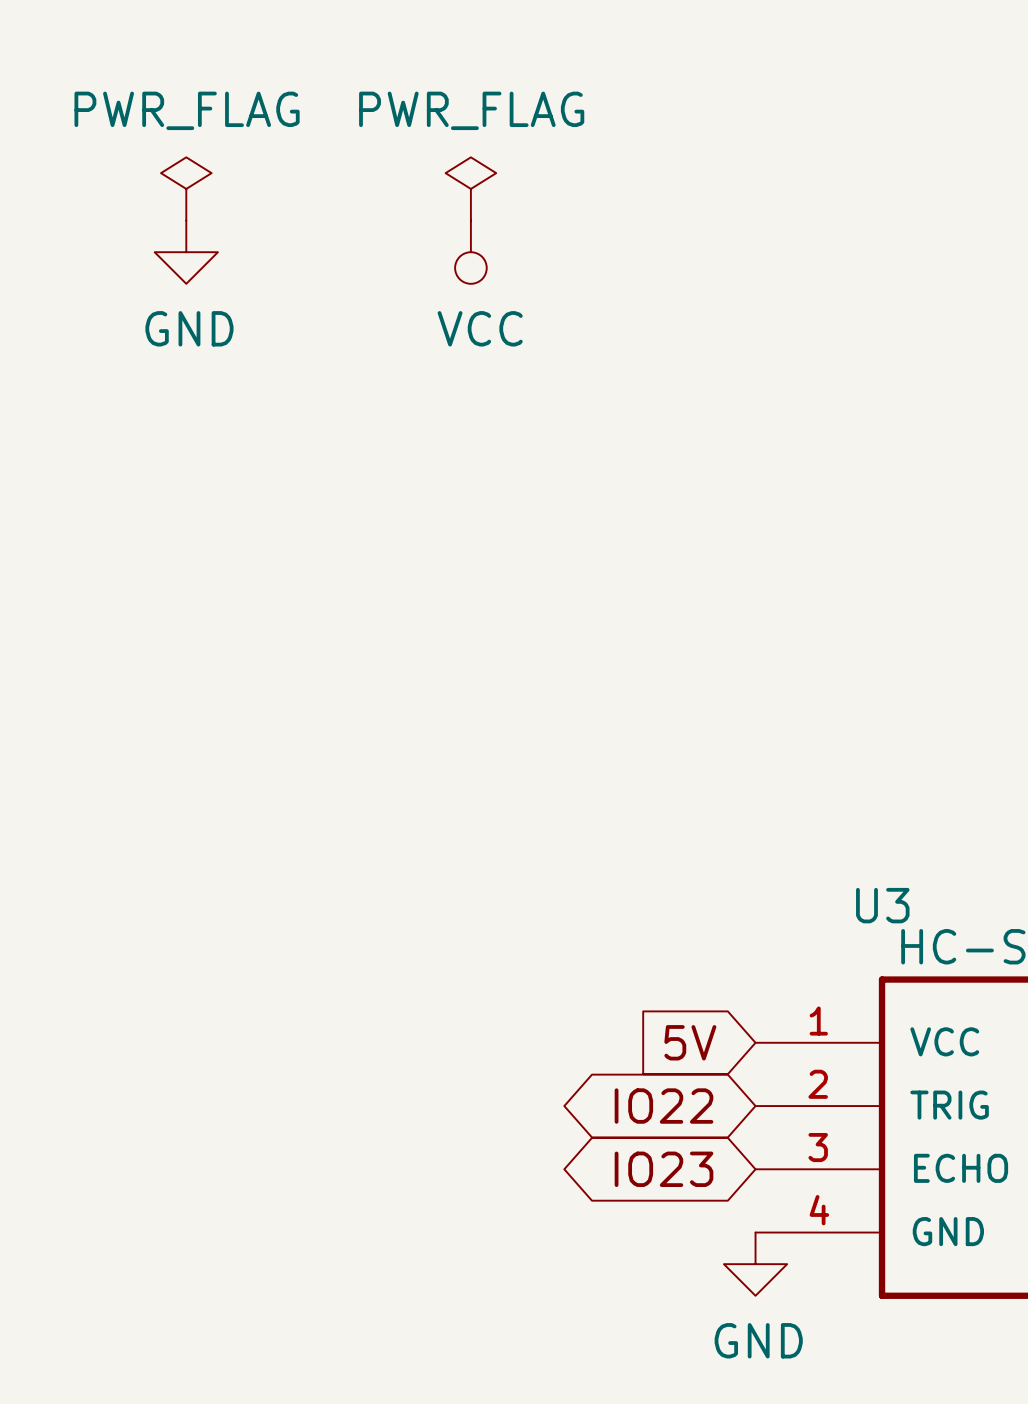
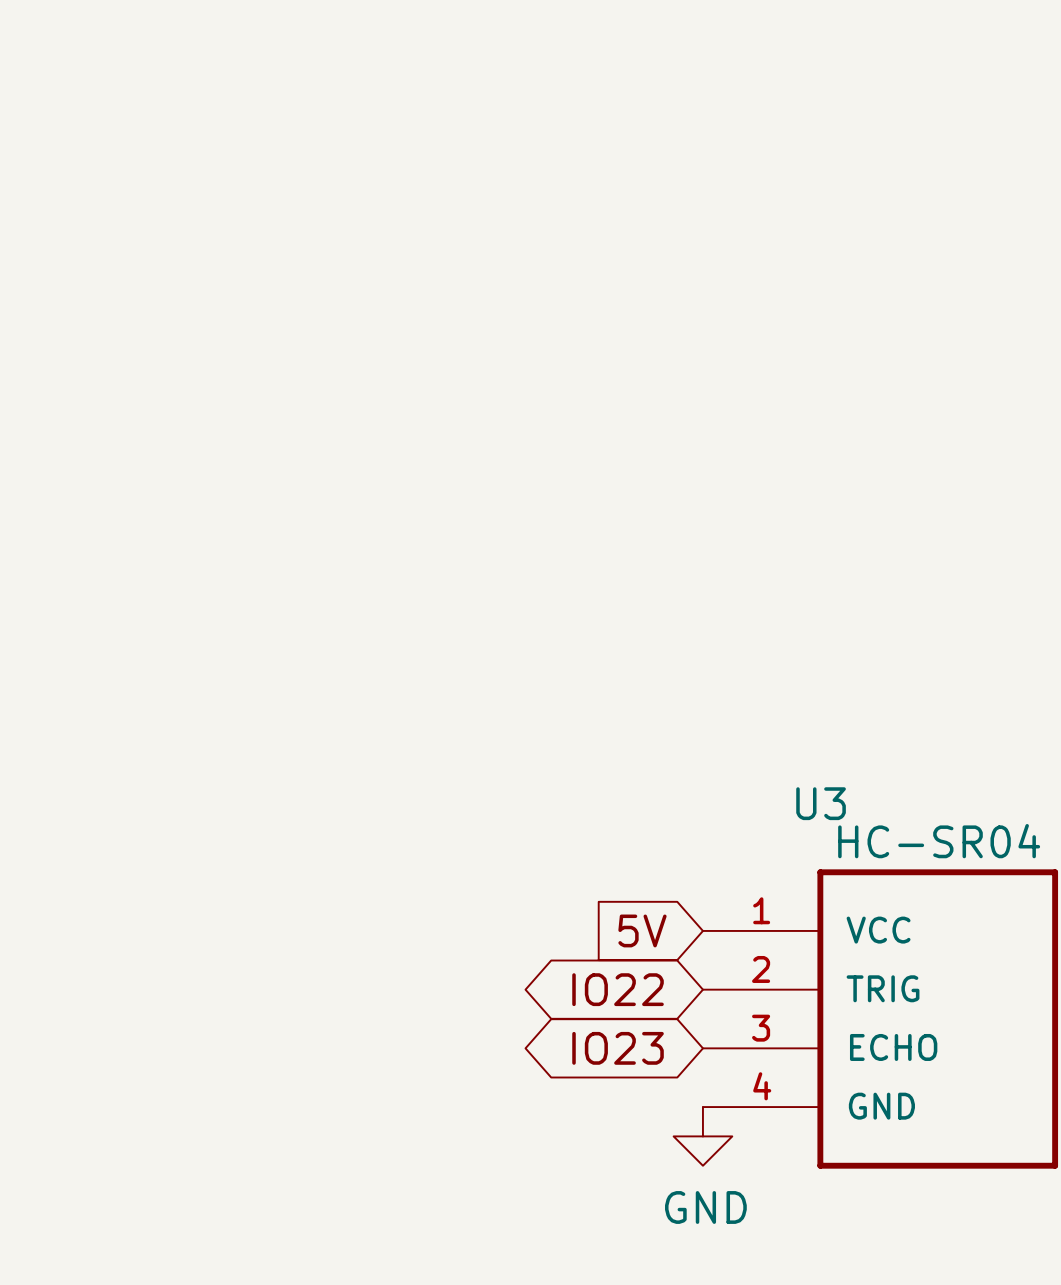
power symbol: PWR_FLAG (186, 188) -> none
power symbol: PWR_FLAG (470, 188) -> none
power symbol: GND (186, 252) -> none
power symbol: VCC (470, 252) -> none

